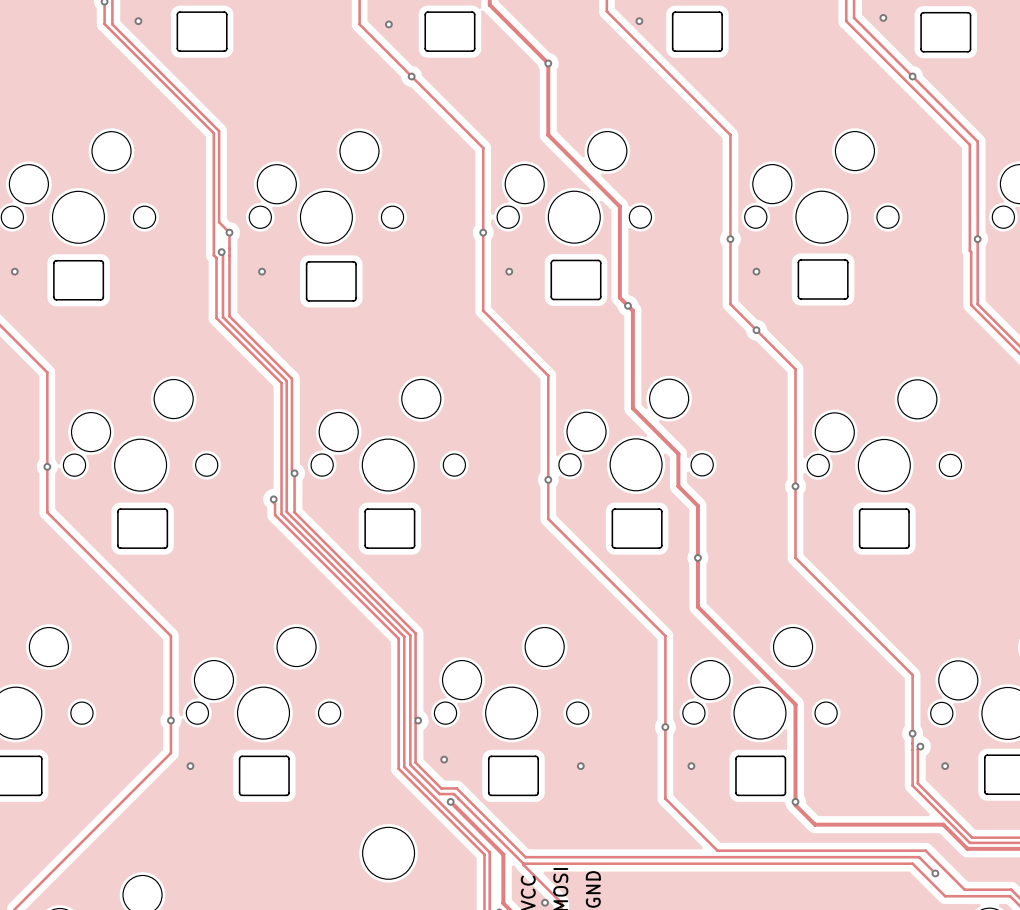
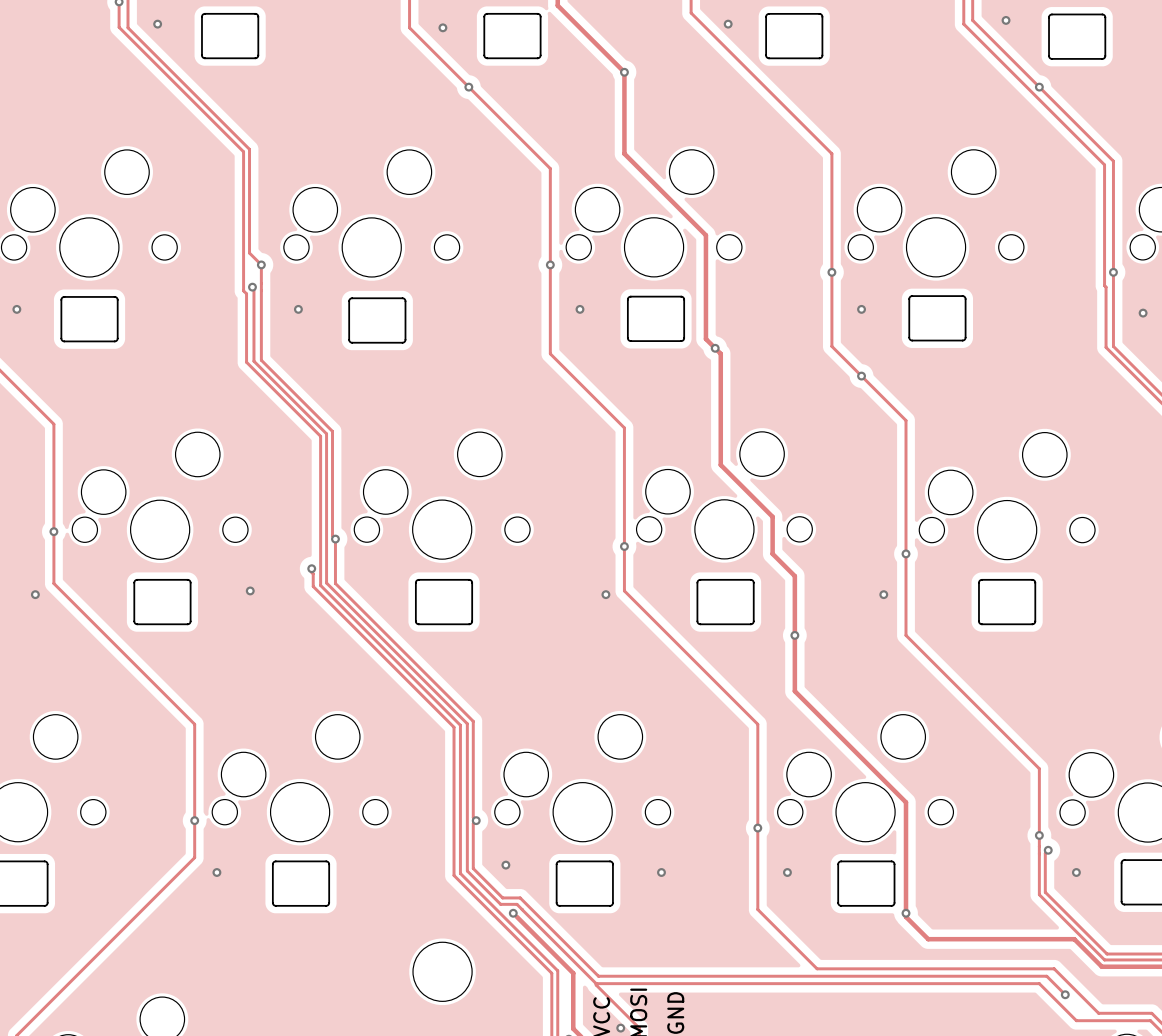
via: none -> (1143, 313)
via: none -> (250, 590)
via: none -> (35, 594)
via: none -> (605, 594)
via: none -> (883, 594)

